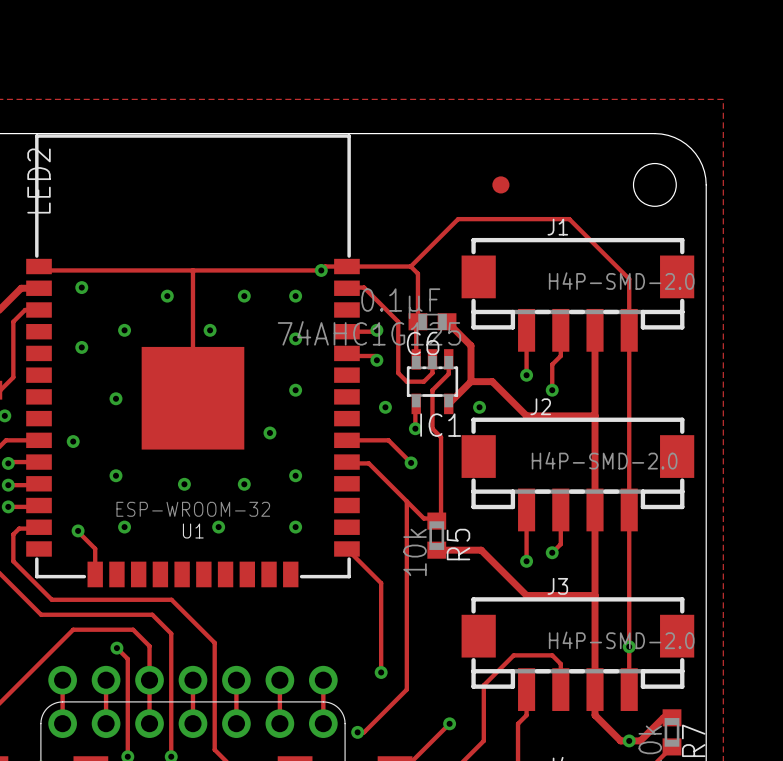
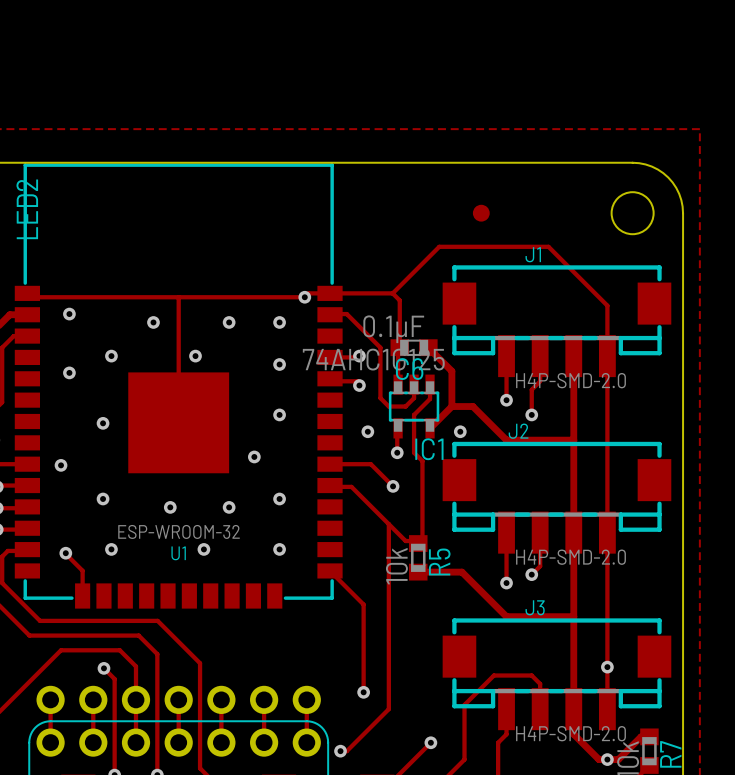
J1 value position: H4P-SMD-2.0 (621, 281) -> H4P-SMD-2.0 (570, 380)
J2 value position: H4P-SMD-2.0 (604, 460) -> H4P-SMD-2.0 (570, 557)
J3 value position: H4P-SMD-2.0 (621, 640) -> H4P-SMD-2.0 (570, 733)

